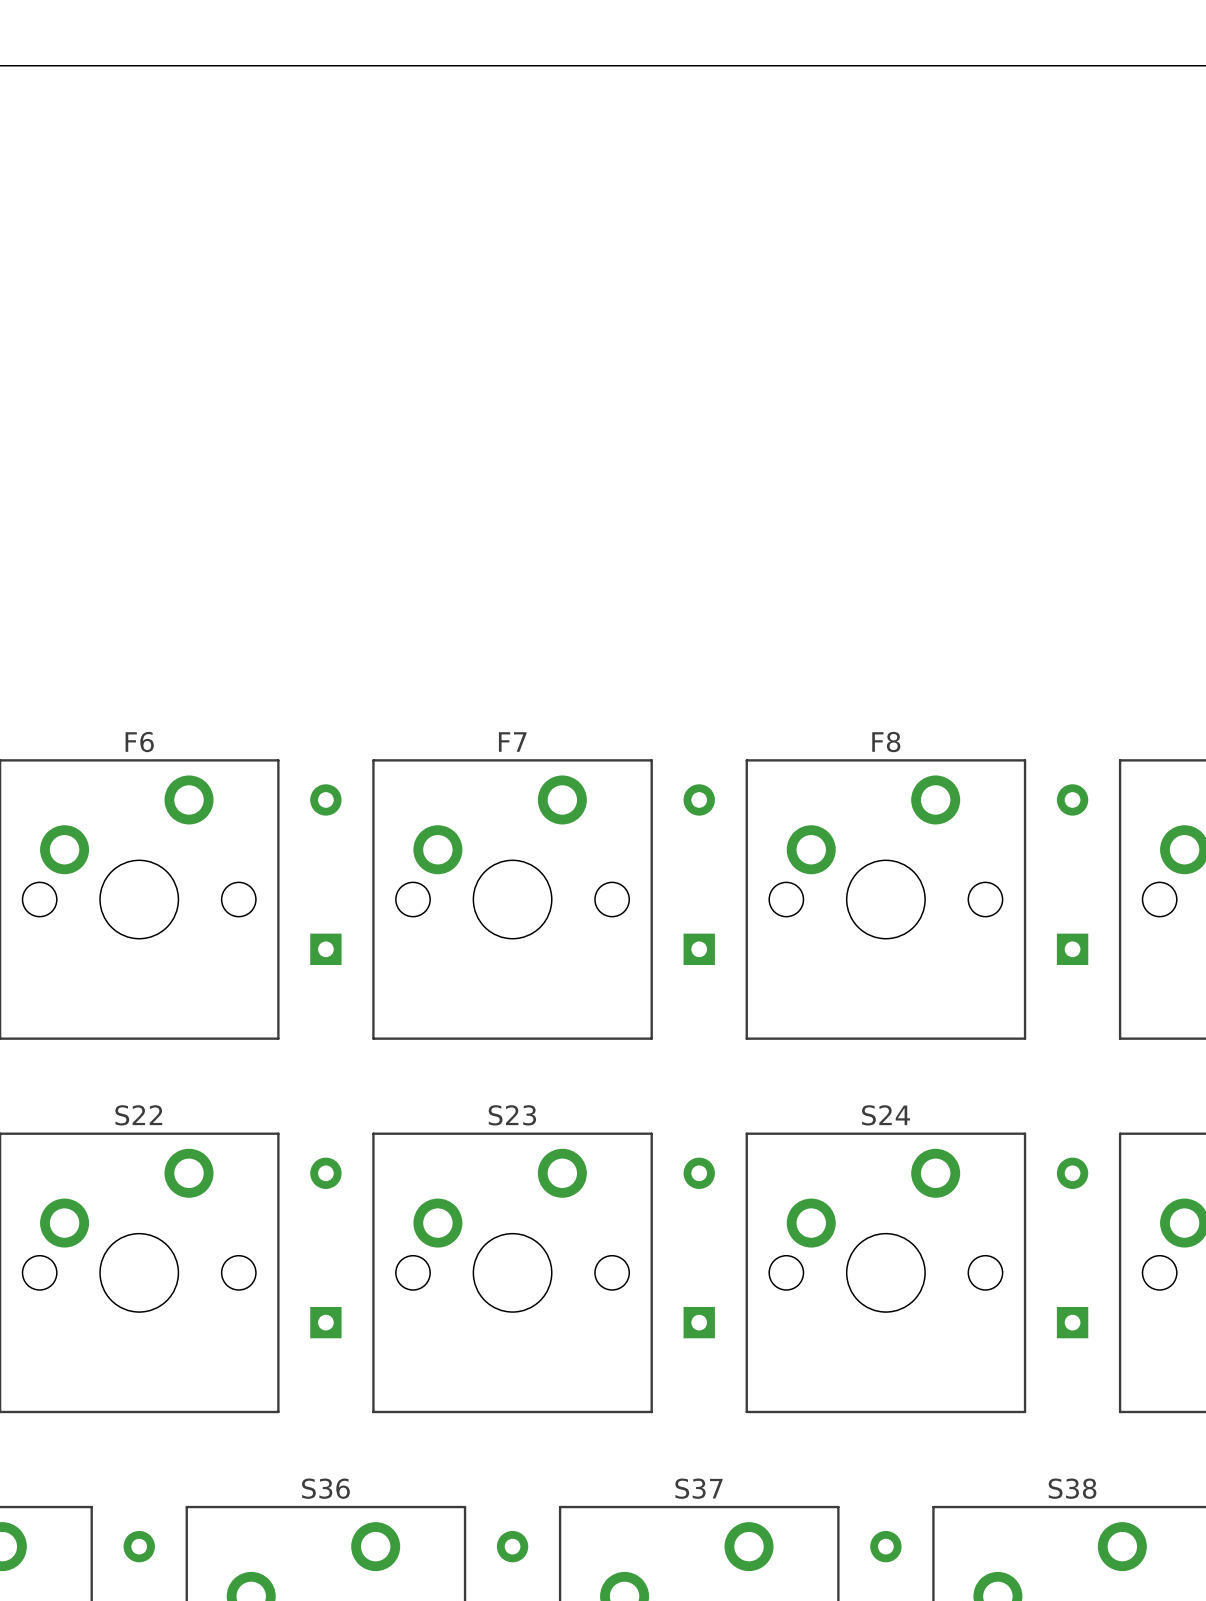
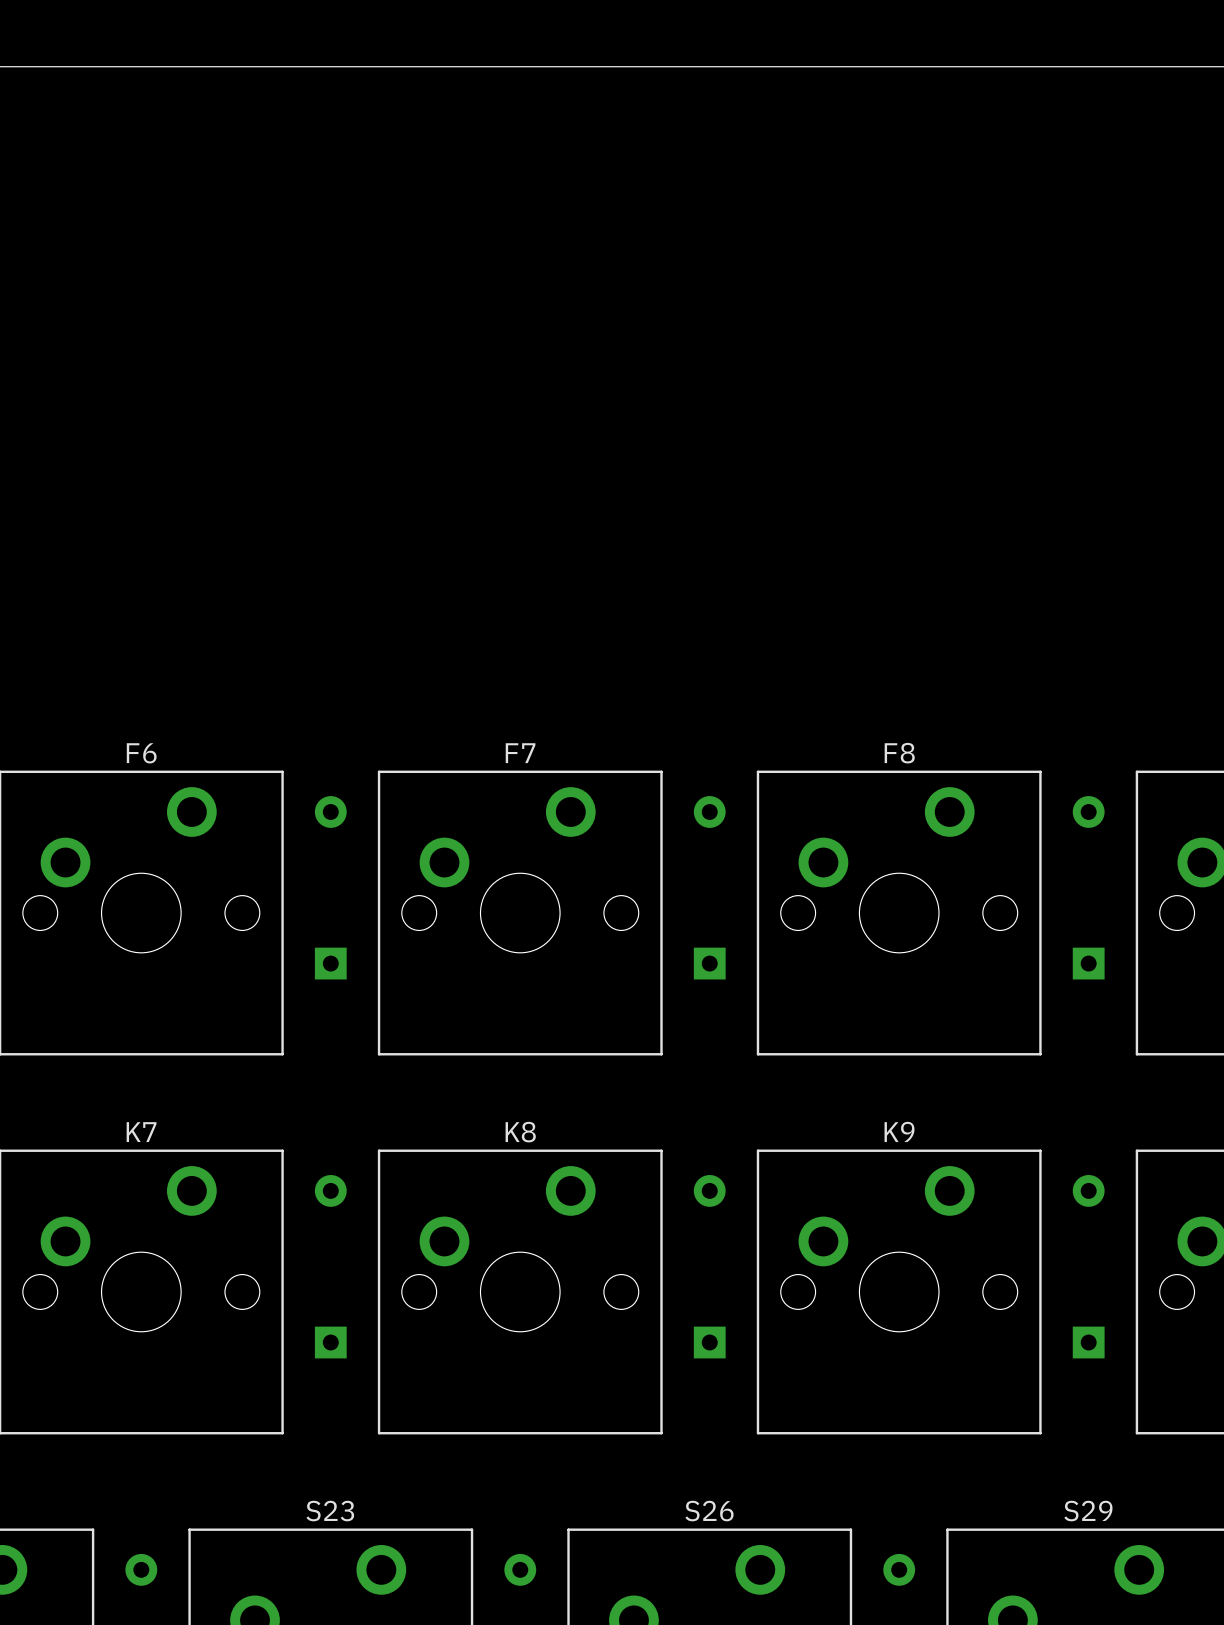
S22 name: S22 (138, 1115) -> K7 (141, 1132)
S23 name: S23 (512, 1115) -> K8 (520, 1132)
S24 name: S24 (886, 1115) -> K9 (899, 1131)
S36 name: S36 (325, 1488) -> S23 (330, 1511)
S37 name: S37 (698, 1488) -> S26 (709, 1511)
S38 name: S38 (1072, 1488) -> S29 (1088, 1511)

